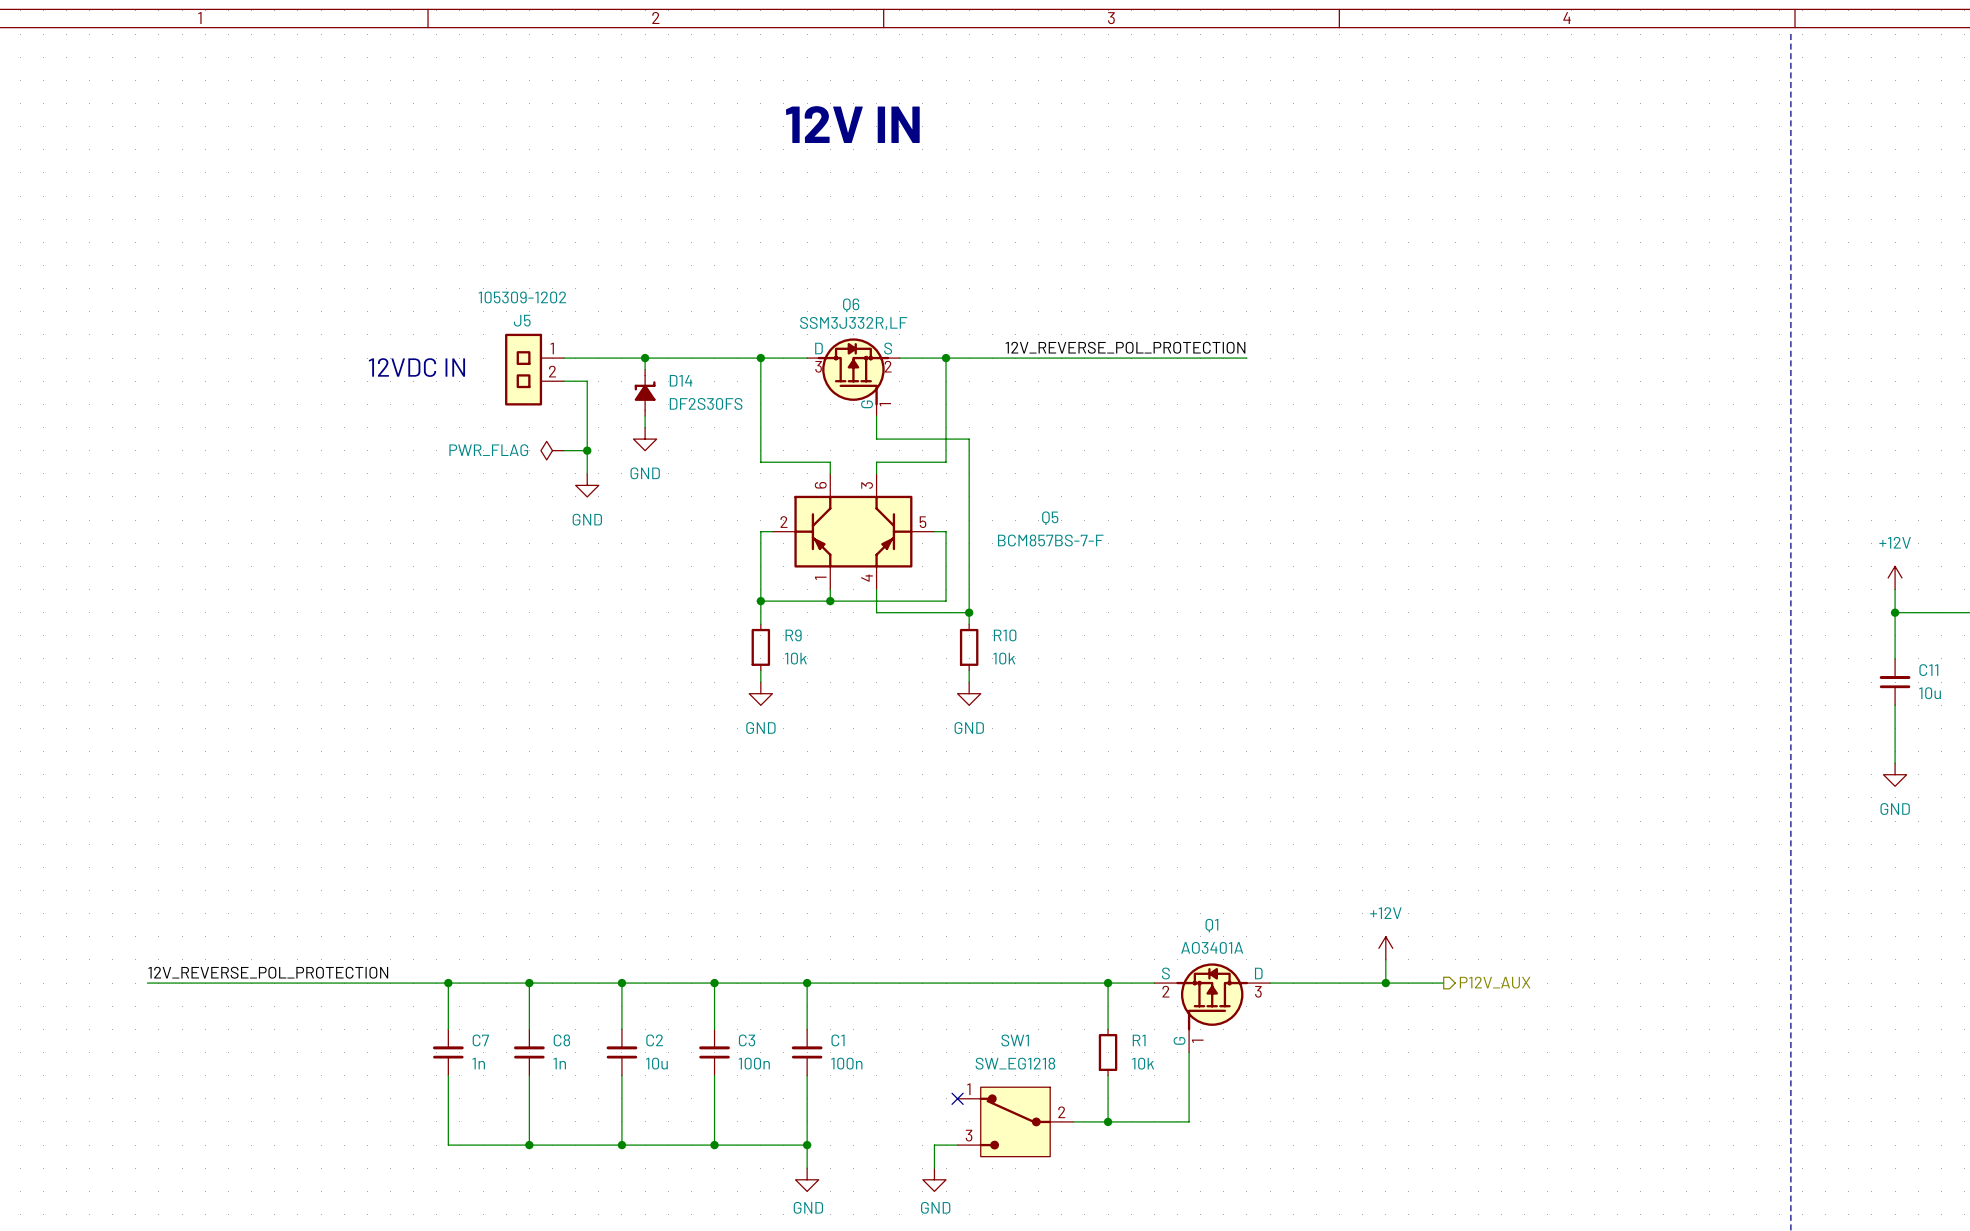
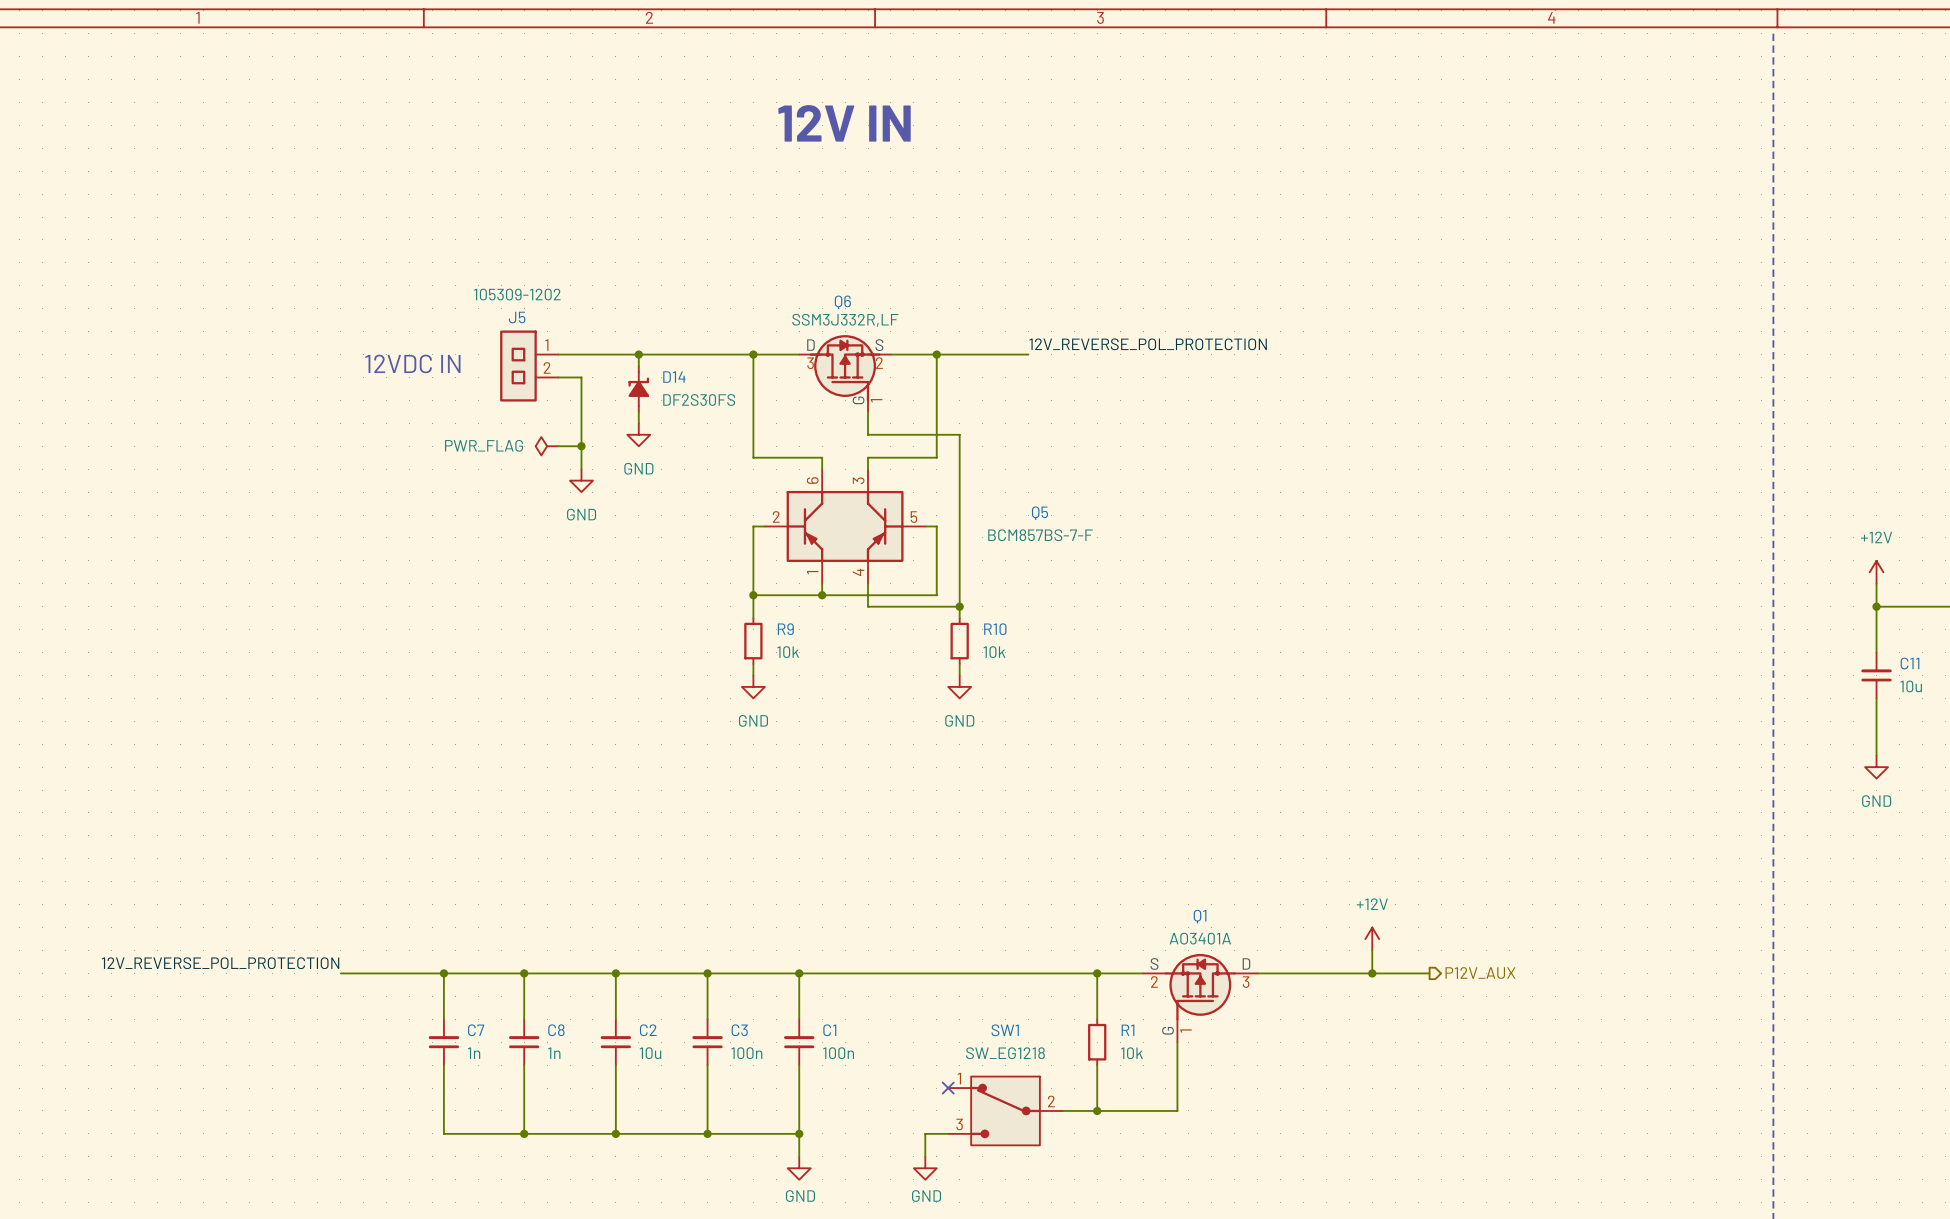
label position: 12V_REVERSE_POL_PROTECTION (1125, 347) -> 12V_REVERSE_POL_PROTECTION (1148, 344)
wire: (1038, 358) (1246, 358) -> none
label position: 12V_REVERSE_POL_PROTECTION (268, 972) -> 12V_REVERSE_POL_PROTECTION (220, 963)
wire: (147, 983) (344, 983) -> none

